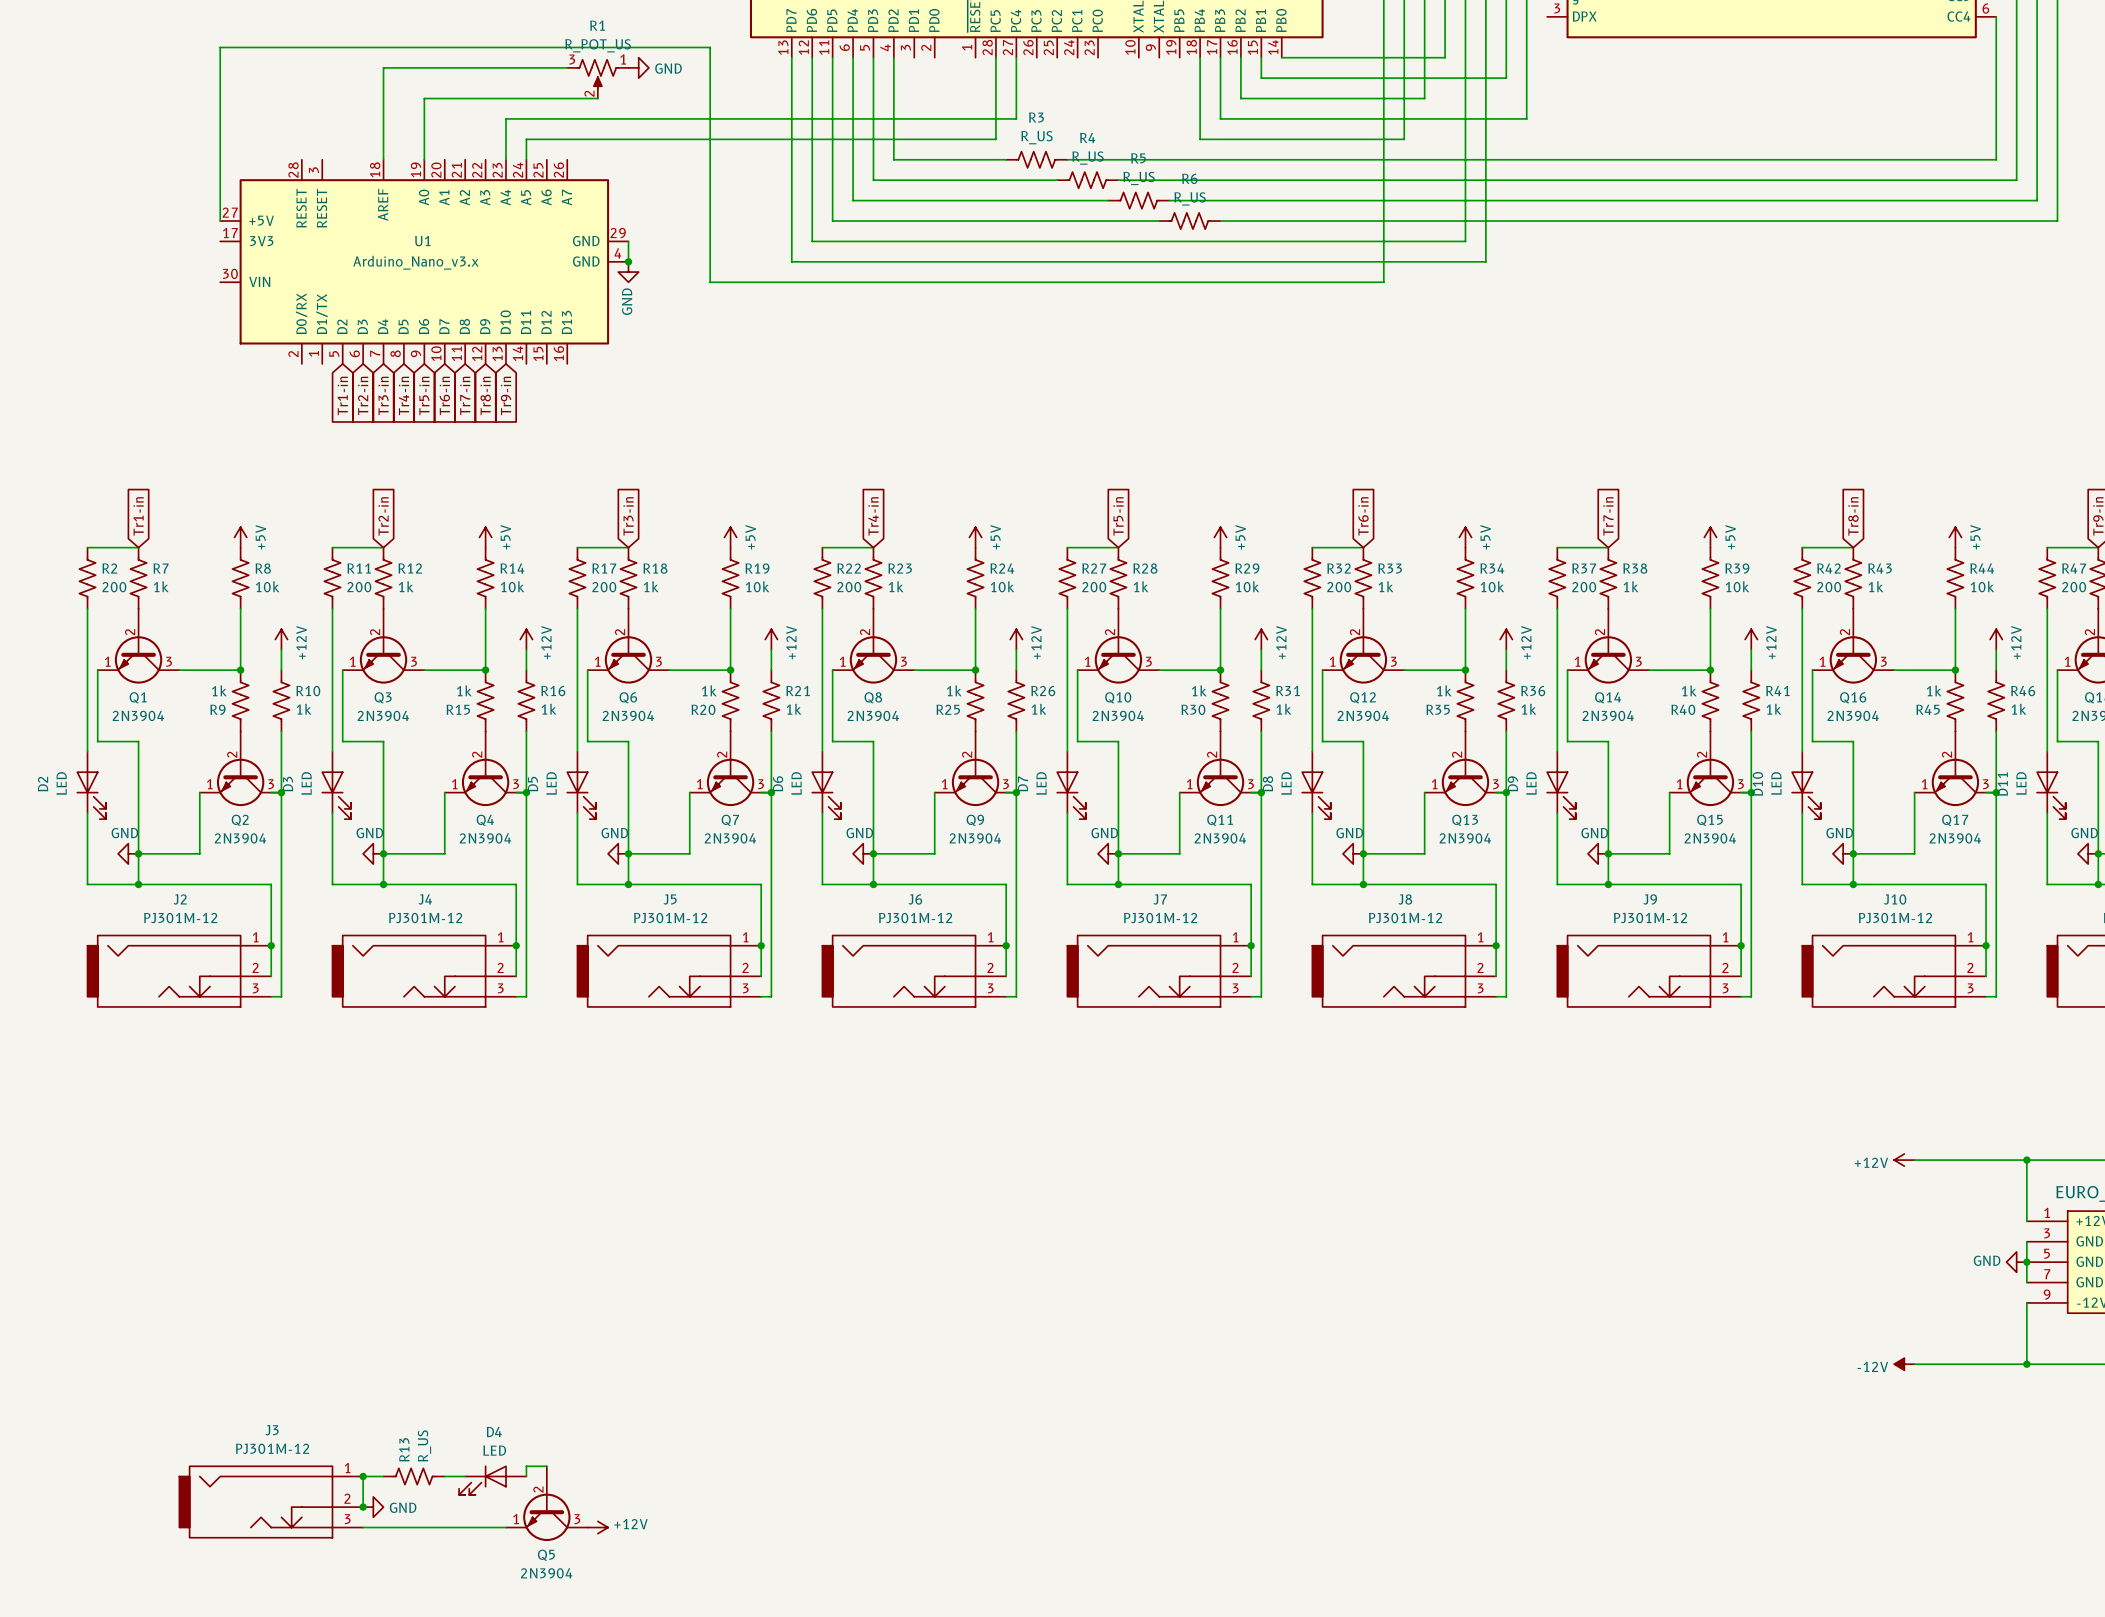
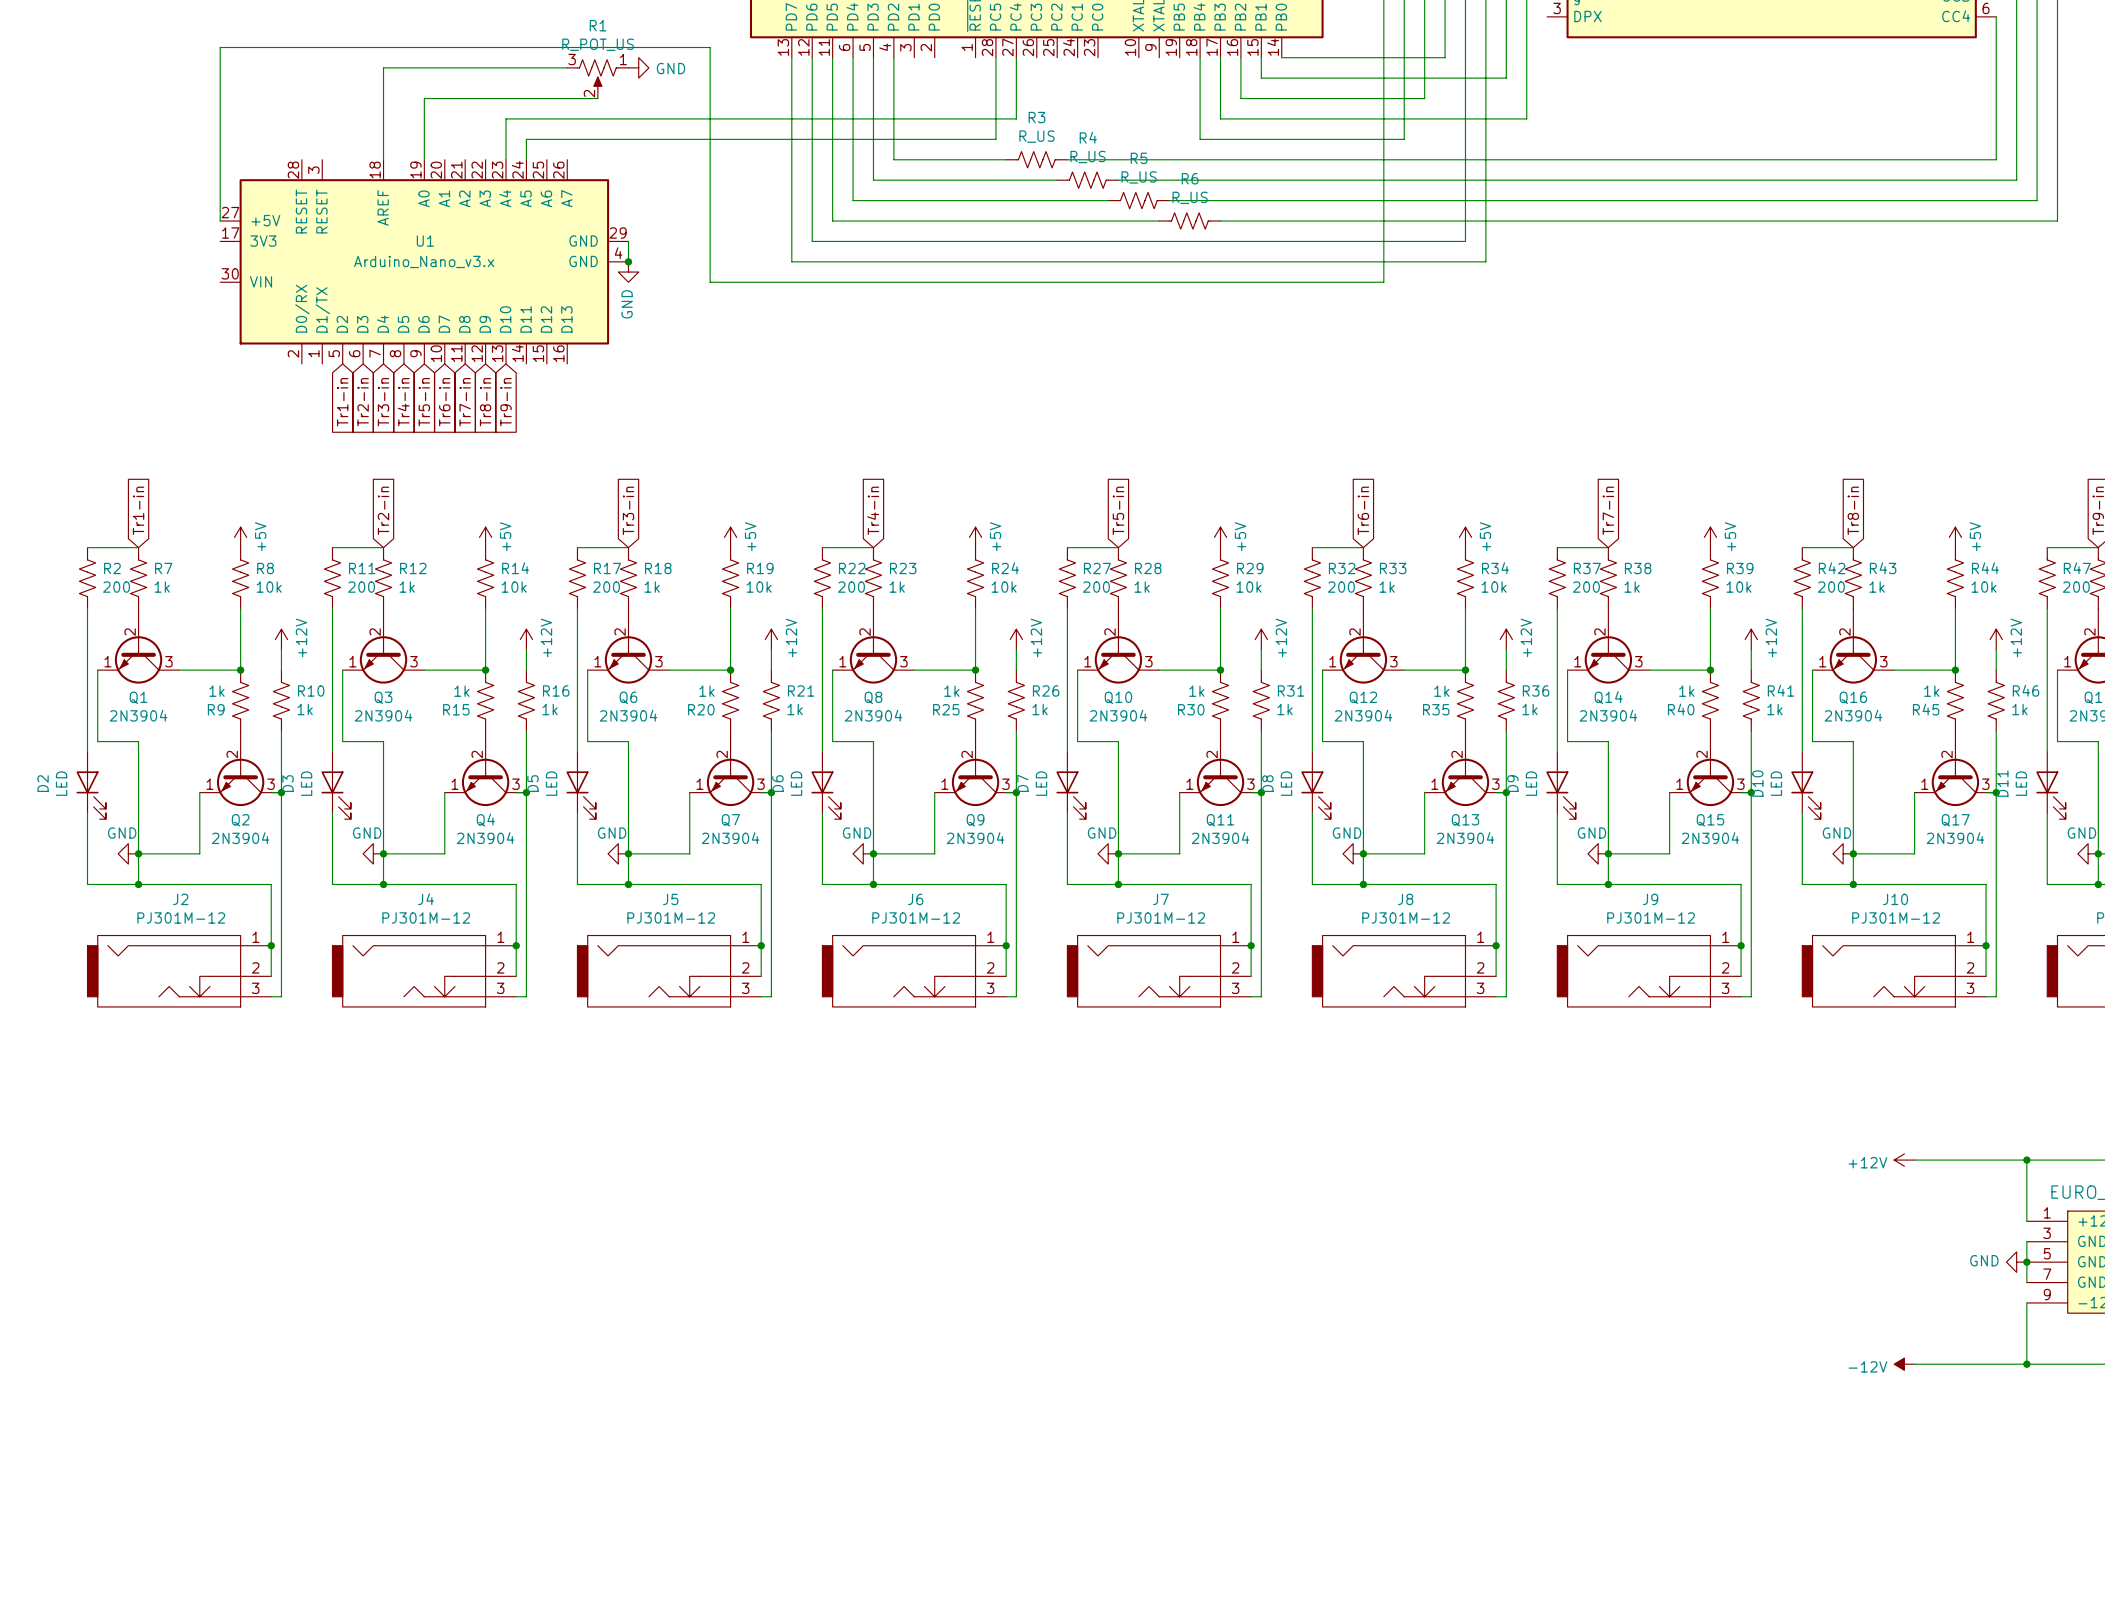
wire: (546, 1466) (526, 1466) (526, 1476) -> none
junction: (363, 1476) -> none
wire: (383, 1476) (363, 1476) (363, 1507) -> none
R13: R_US (414, 1476) -> none
wire: (444, 1476) (465, 1476) -> none
D4: LED (492, 1480) -> none
J3: PJ301M-12 (271, 1502) -> none
Q5: 2N3904 (546, 1503) -> none
junction: (363, 1507) -> none
power symbol: GND (373, 1507) -> none
wire: (363, 1527) (506, 1527) -> none
power symbol: +12V (597, 1527) -> none

